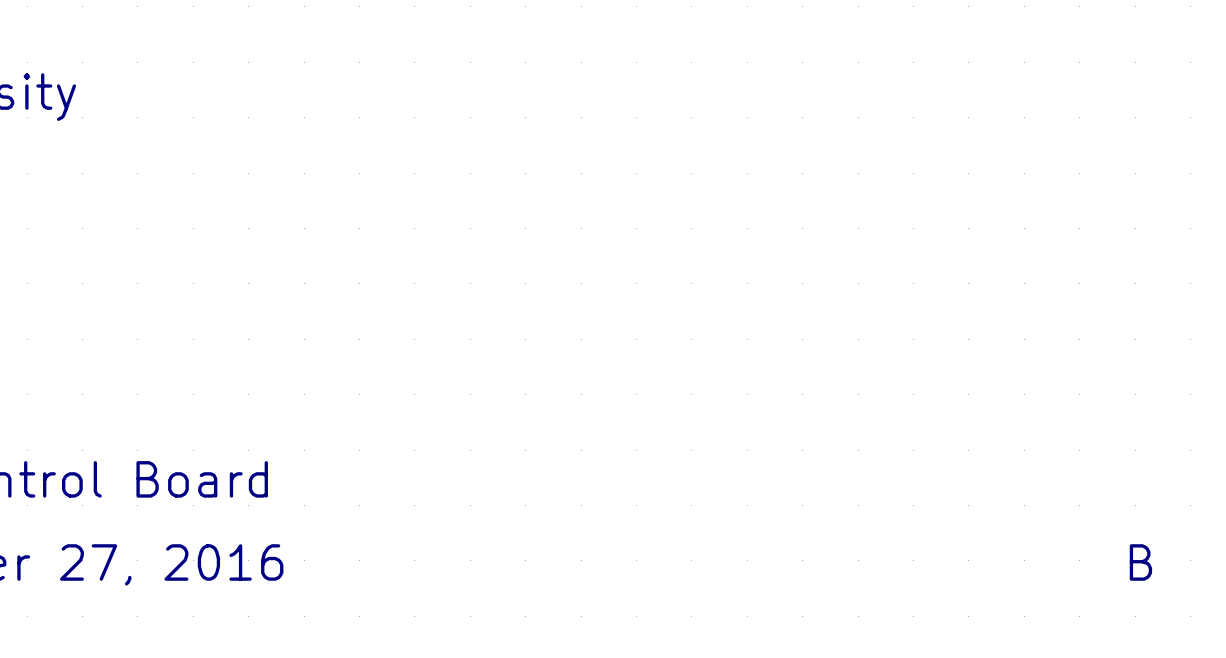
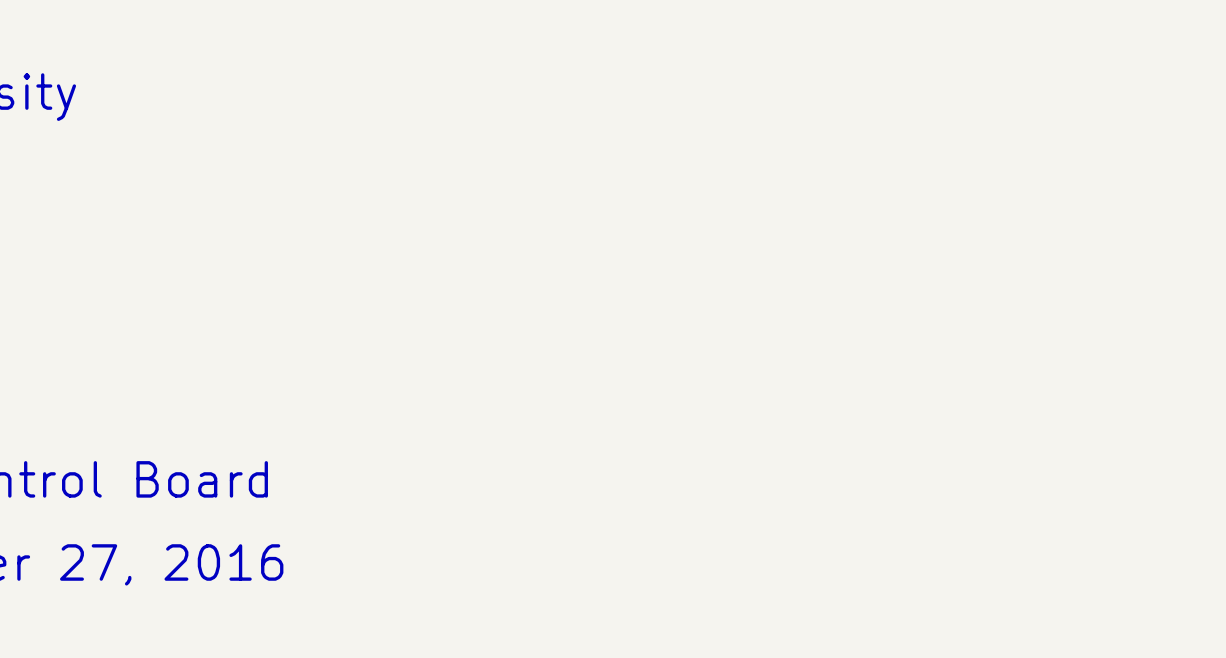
text: B (1140, 562) -> none

